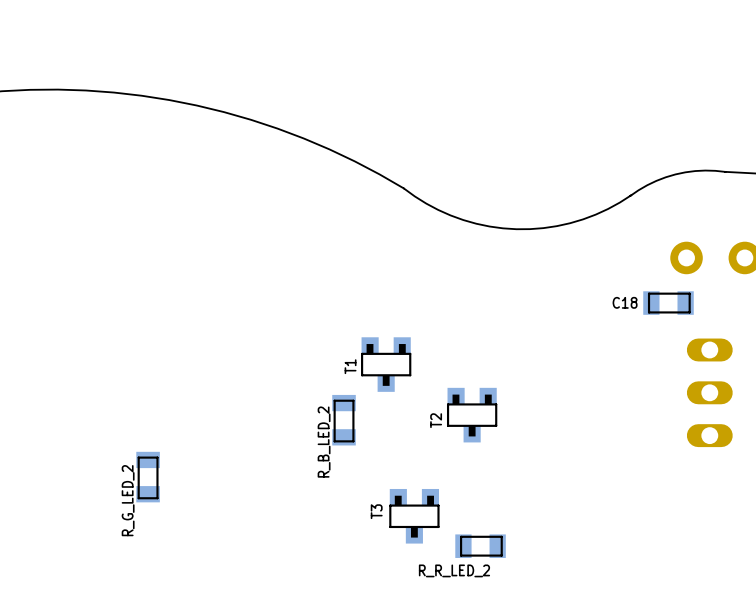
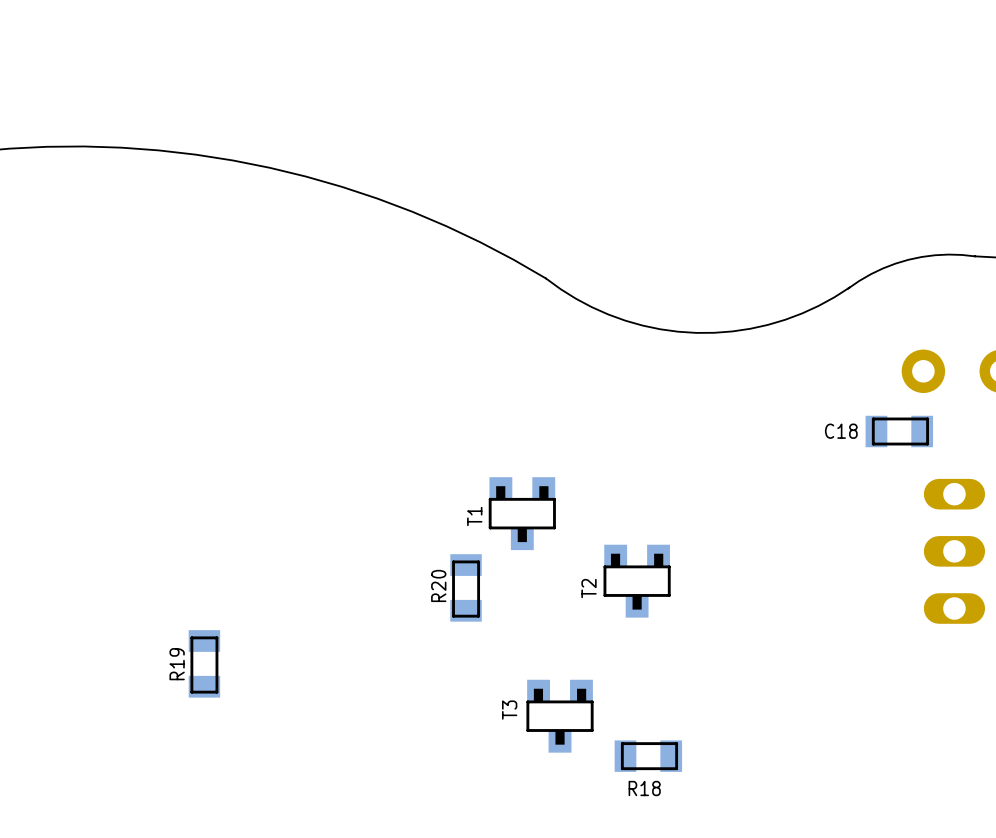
R_B_LED_2 name: R_B_LED_2 (324, 442) -> R20 (438, 585)
R_G_LED_2 name: R_G_LED_2 (128, 500) -> R19 (177, 664)
R_R_LED_2 name: R_R_LED_2 (454, 570) -> R18 (644, 788)

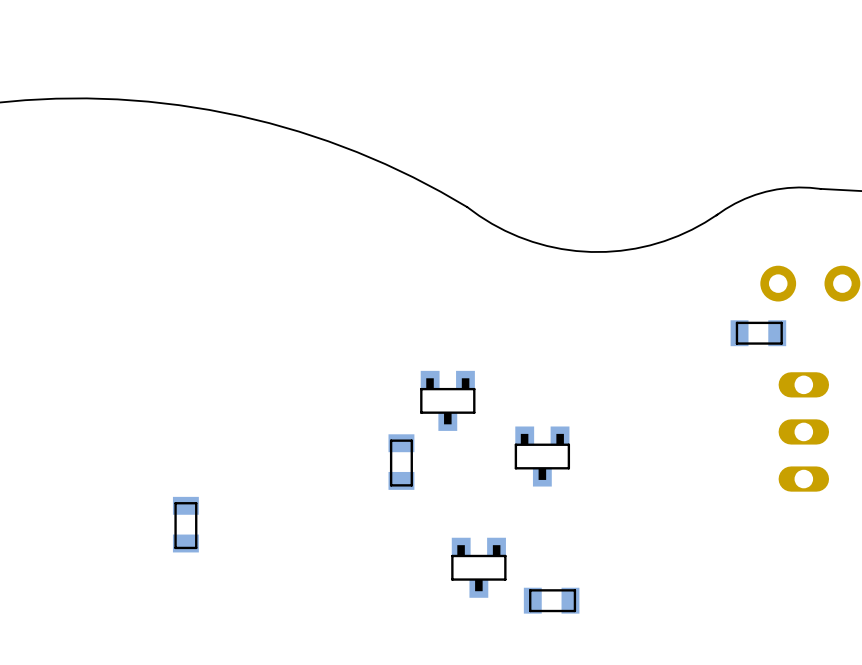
C18 name: C18 (841, 431) -> none
T1 name: T1 (474, 516) -> none
R20 name: R20 (438, 585) -> none
T2 name: T2 (589, 588) -> none
R19 name: R19 (177, 664) -> none
T3 name: T3 (509, 710) -> none
R18 name: R18 (644, 788) -> none

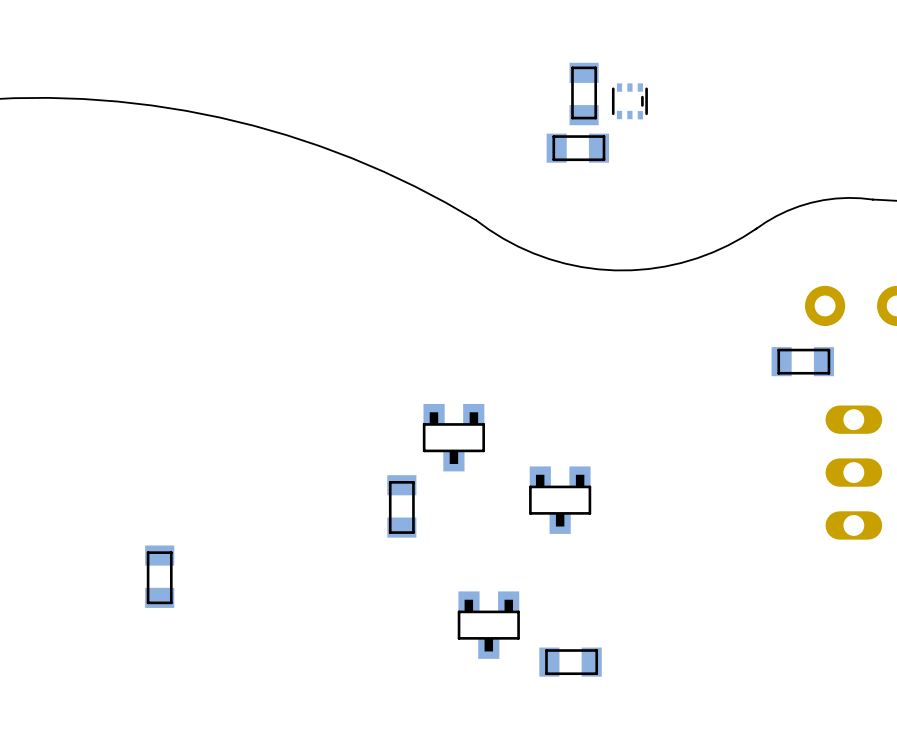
part: none -> (584, 94)
part: none -> (629, 101)
part: none -> (577, 148)

